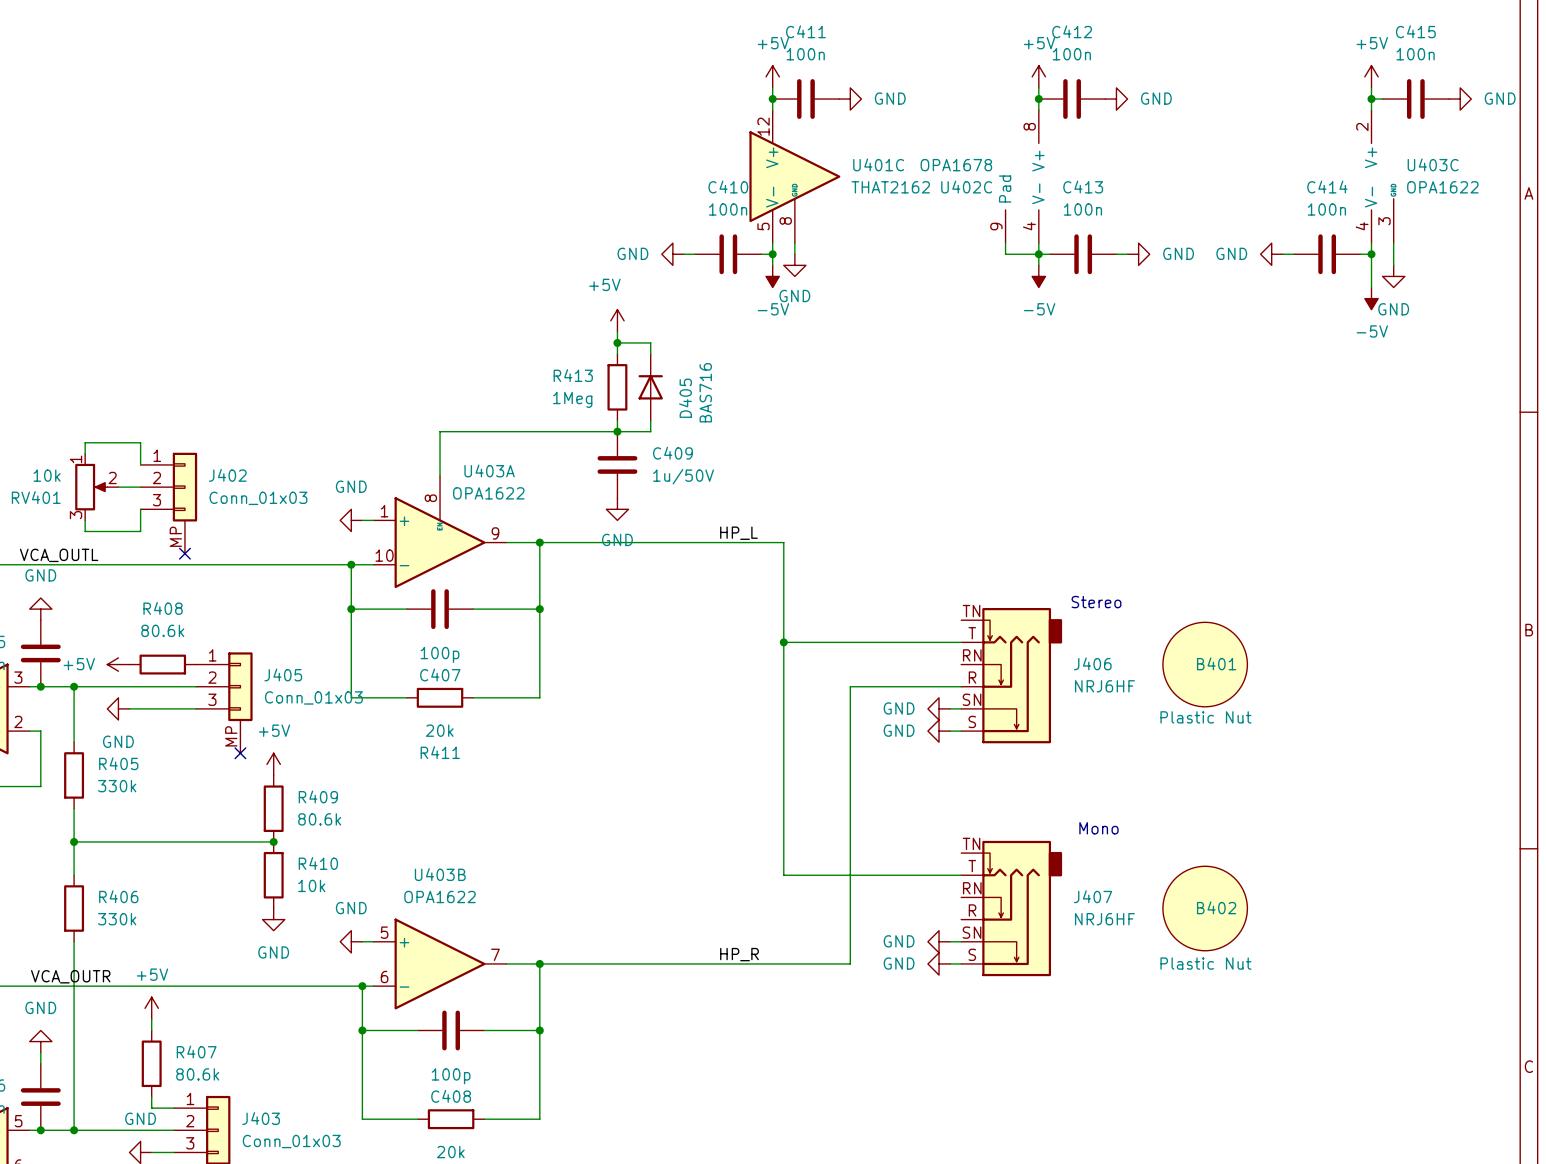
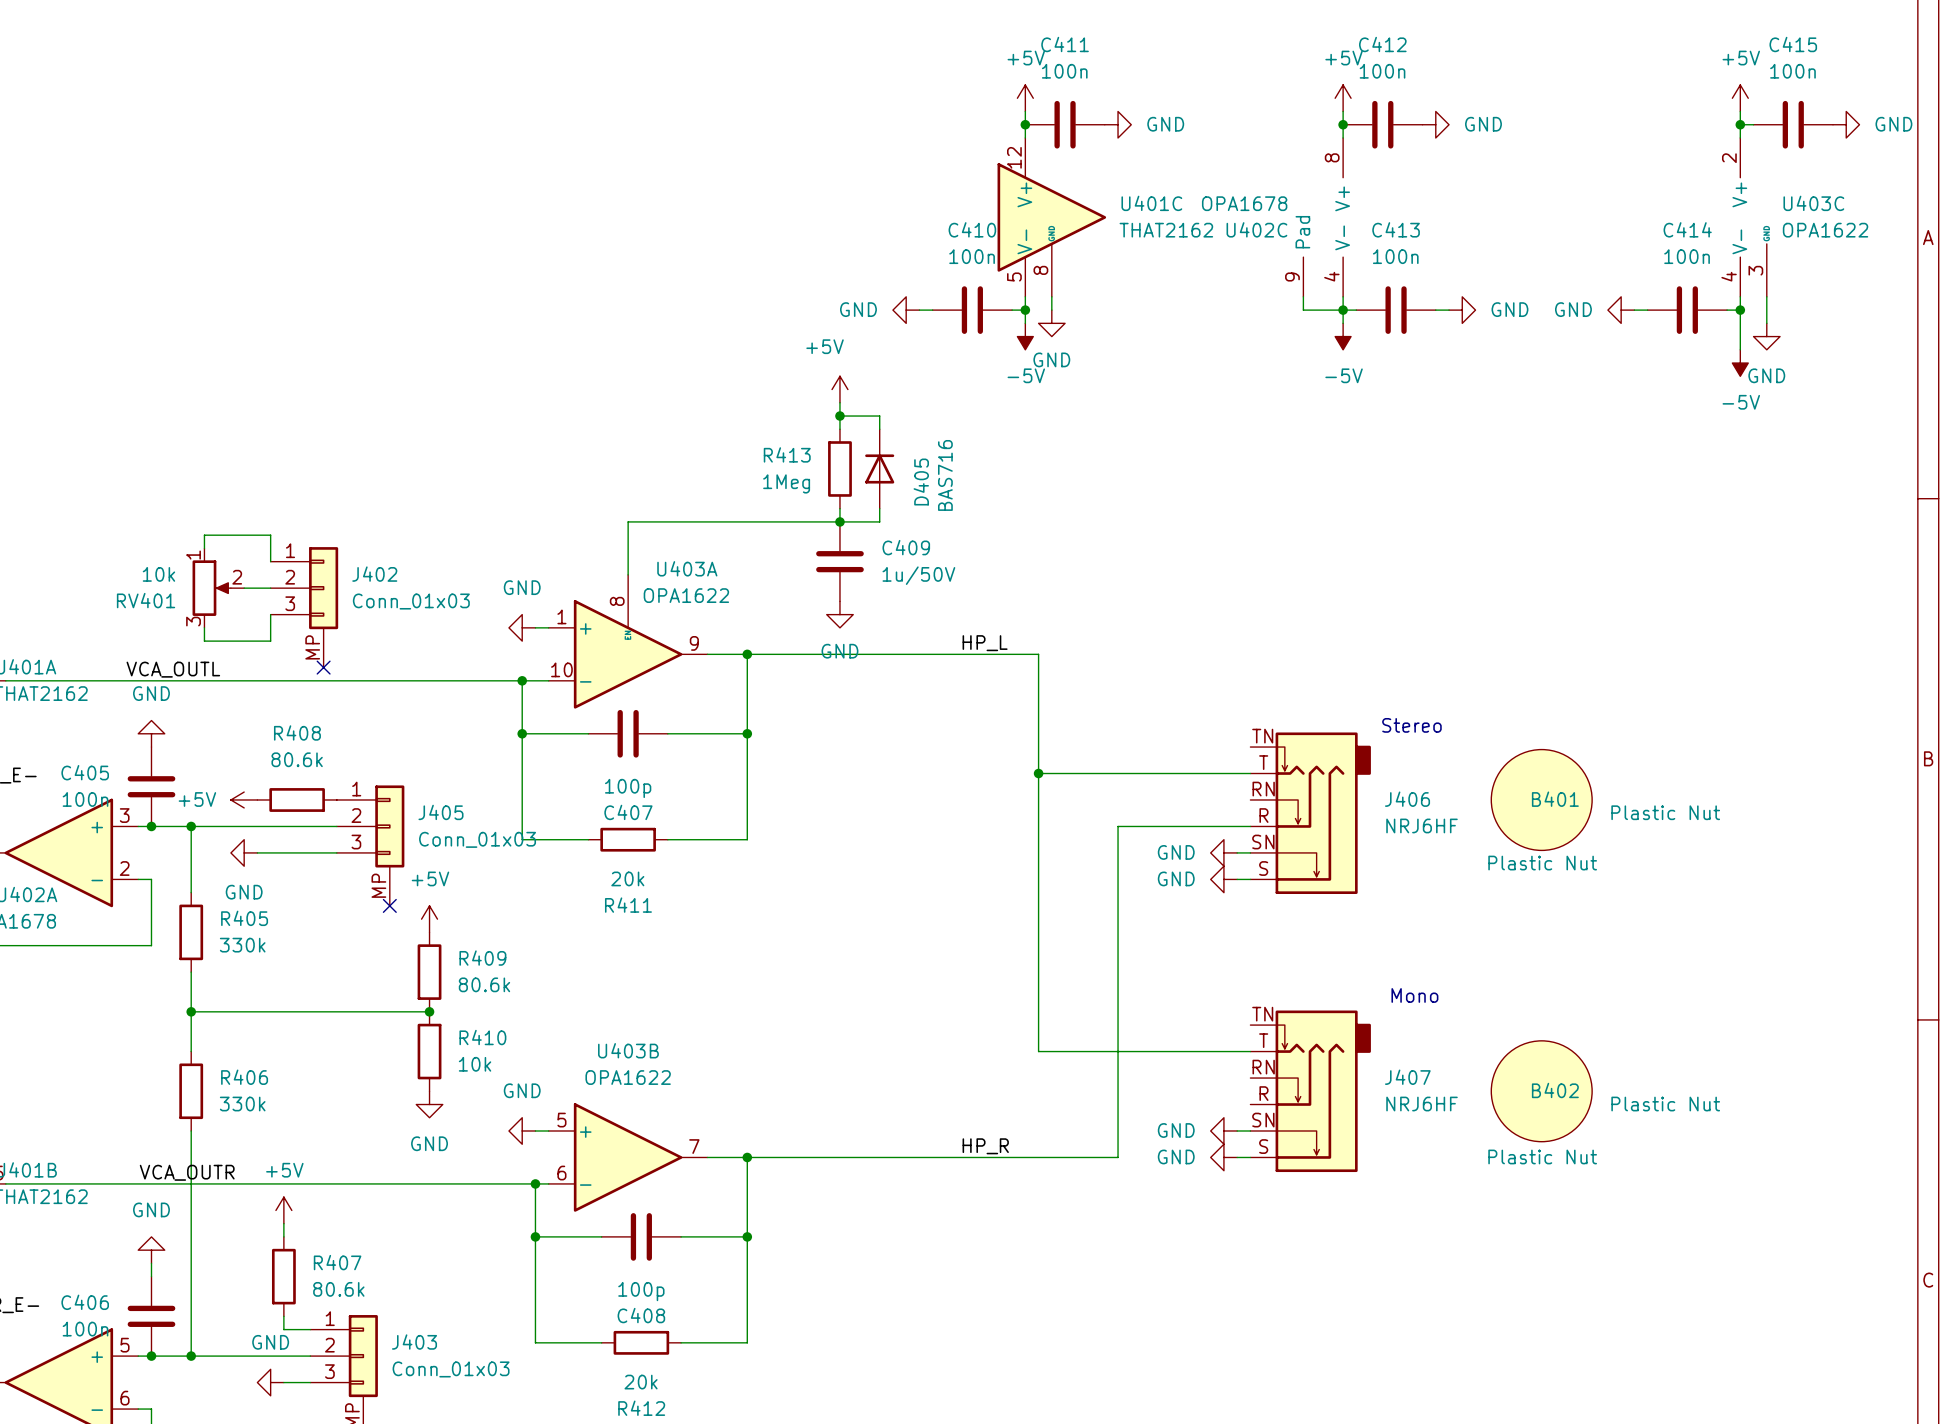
B401 value: none -> Plastic Nut (1665, 812)
B402 value: none -> Plastic Nut (1665, 1104)

